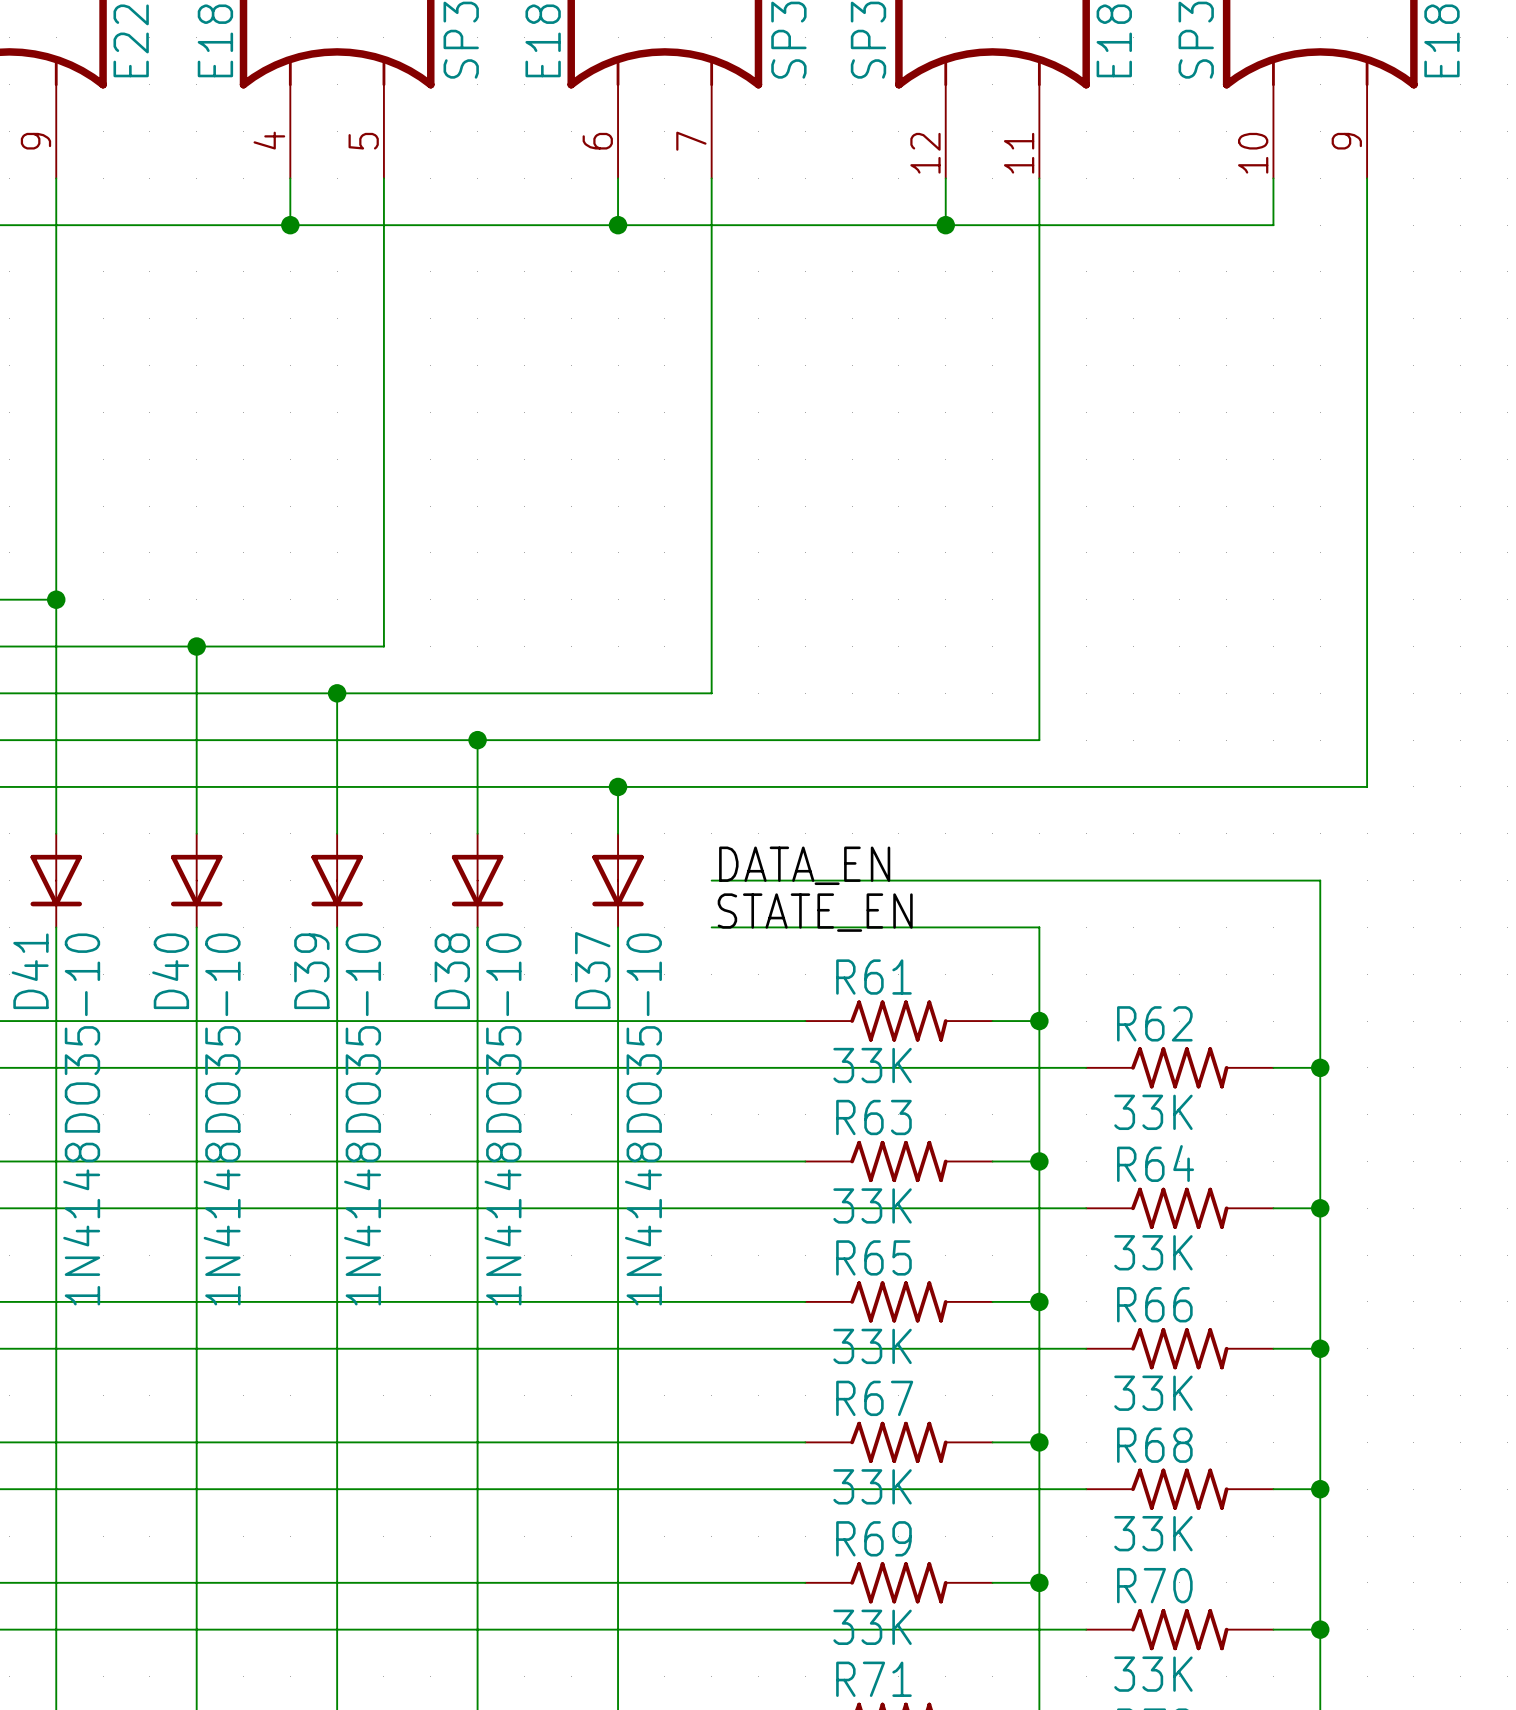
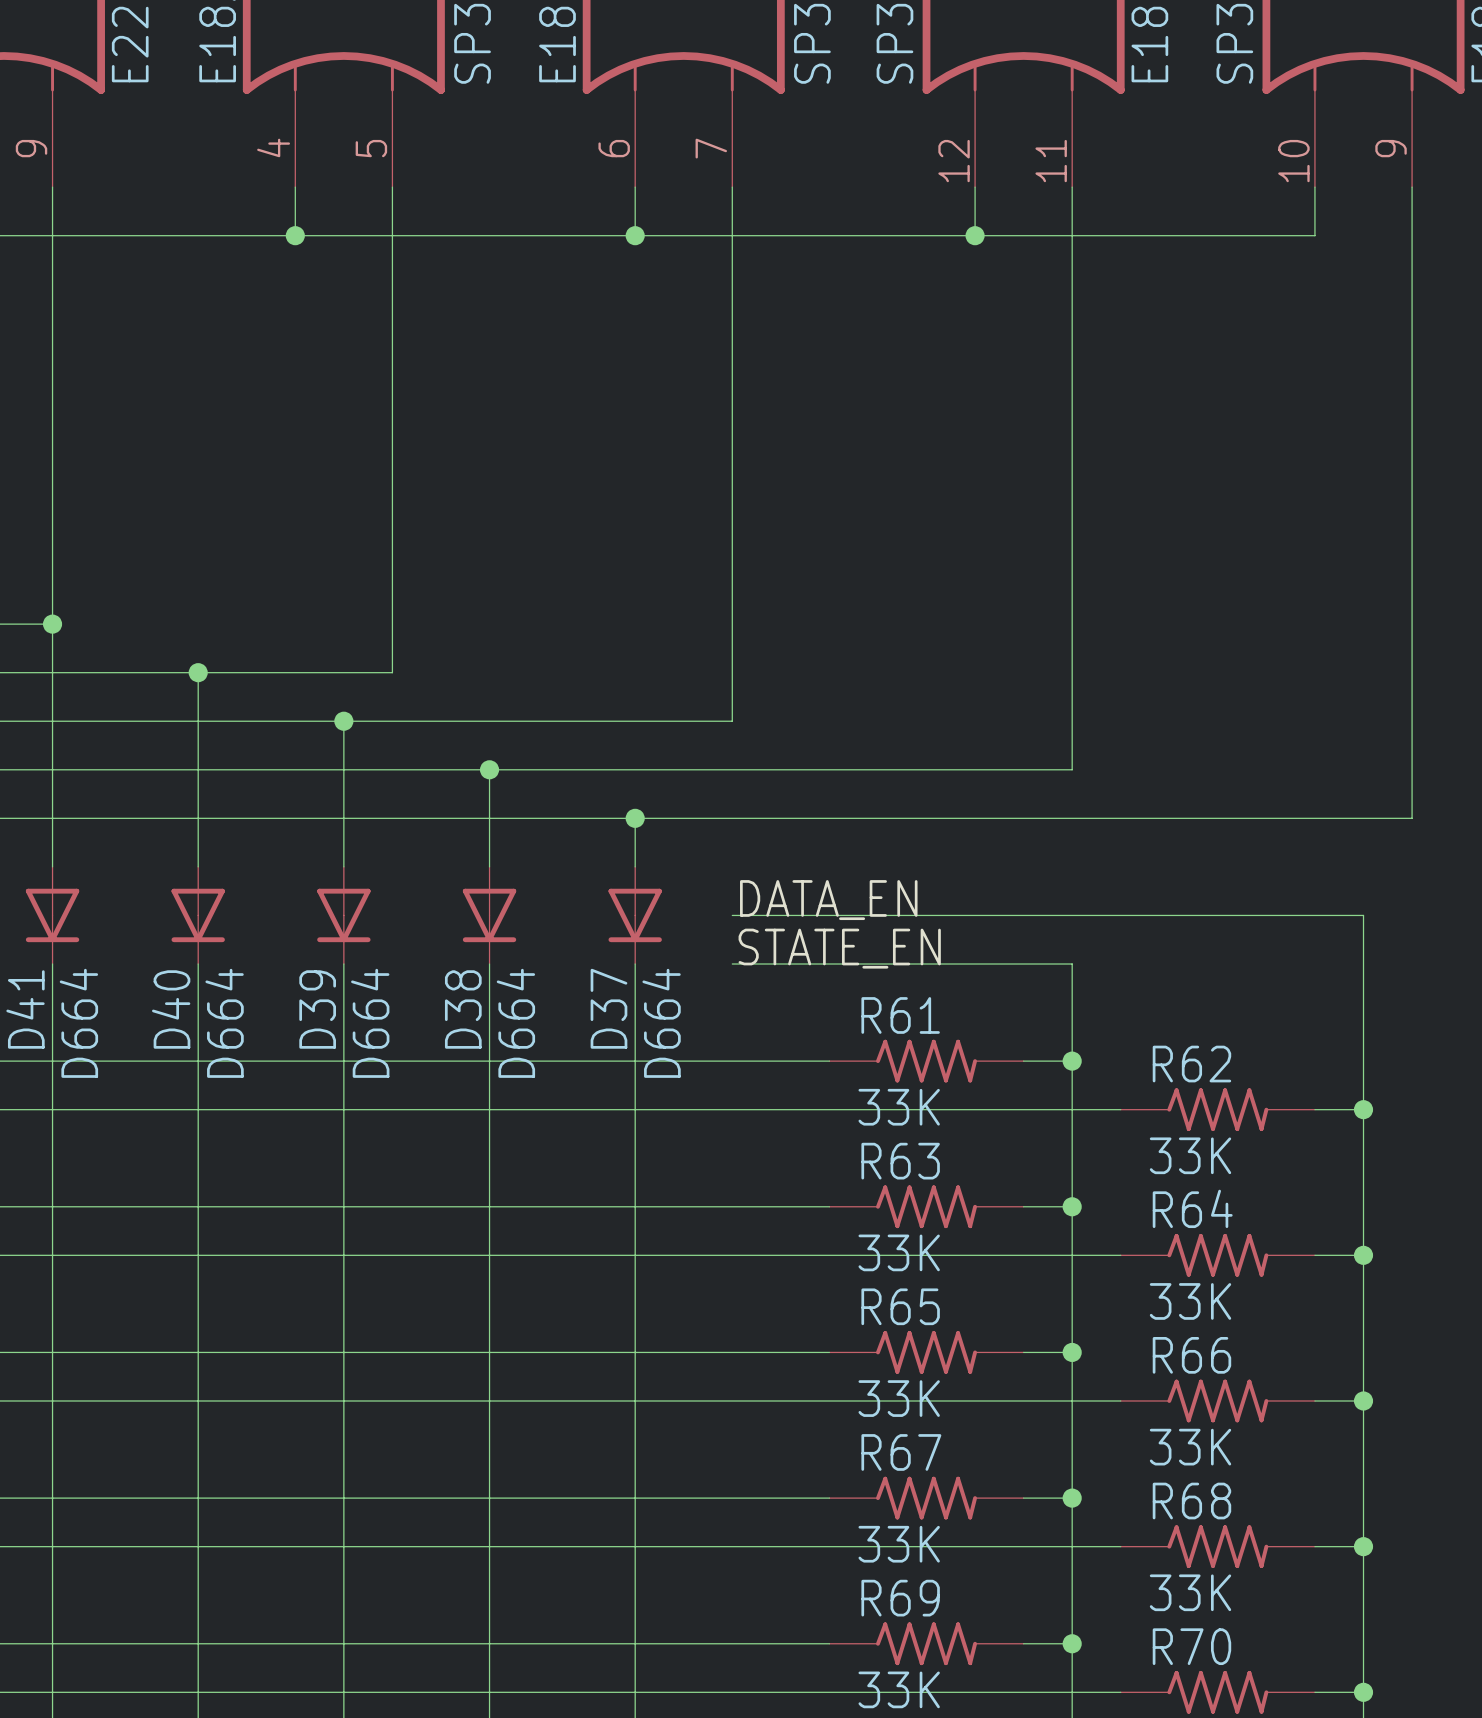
D41 value: 1N4148DO35-10 (81, 1119) -> D664 (78, 1023)
D40 value: 1N4148DO35-10 (222, 1119) -> D664 (224, 1023)
D39 value: 1N4148DO35-10 (362, 1119) -> D664 (370, 1023)
D38 value: 1N4148DO35-10 (503, 1119) -> D664 (515, 1023)
D37 value: 1N4148DO35-10 (643, 1119) -> D664 (661, 1023)

